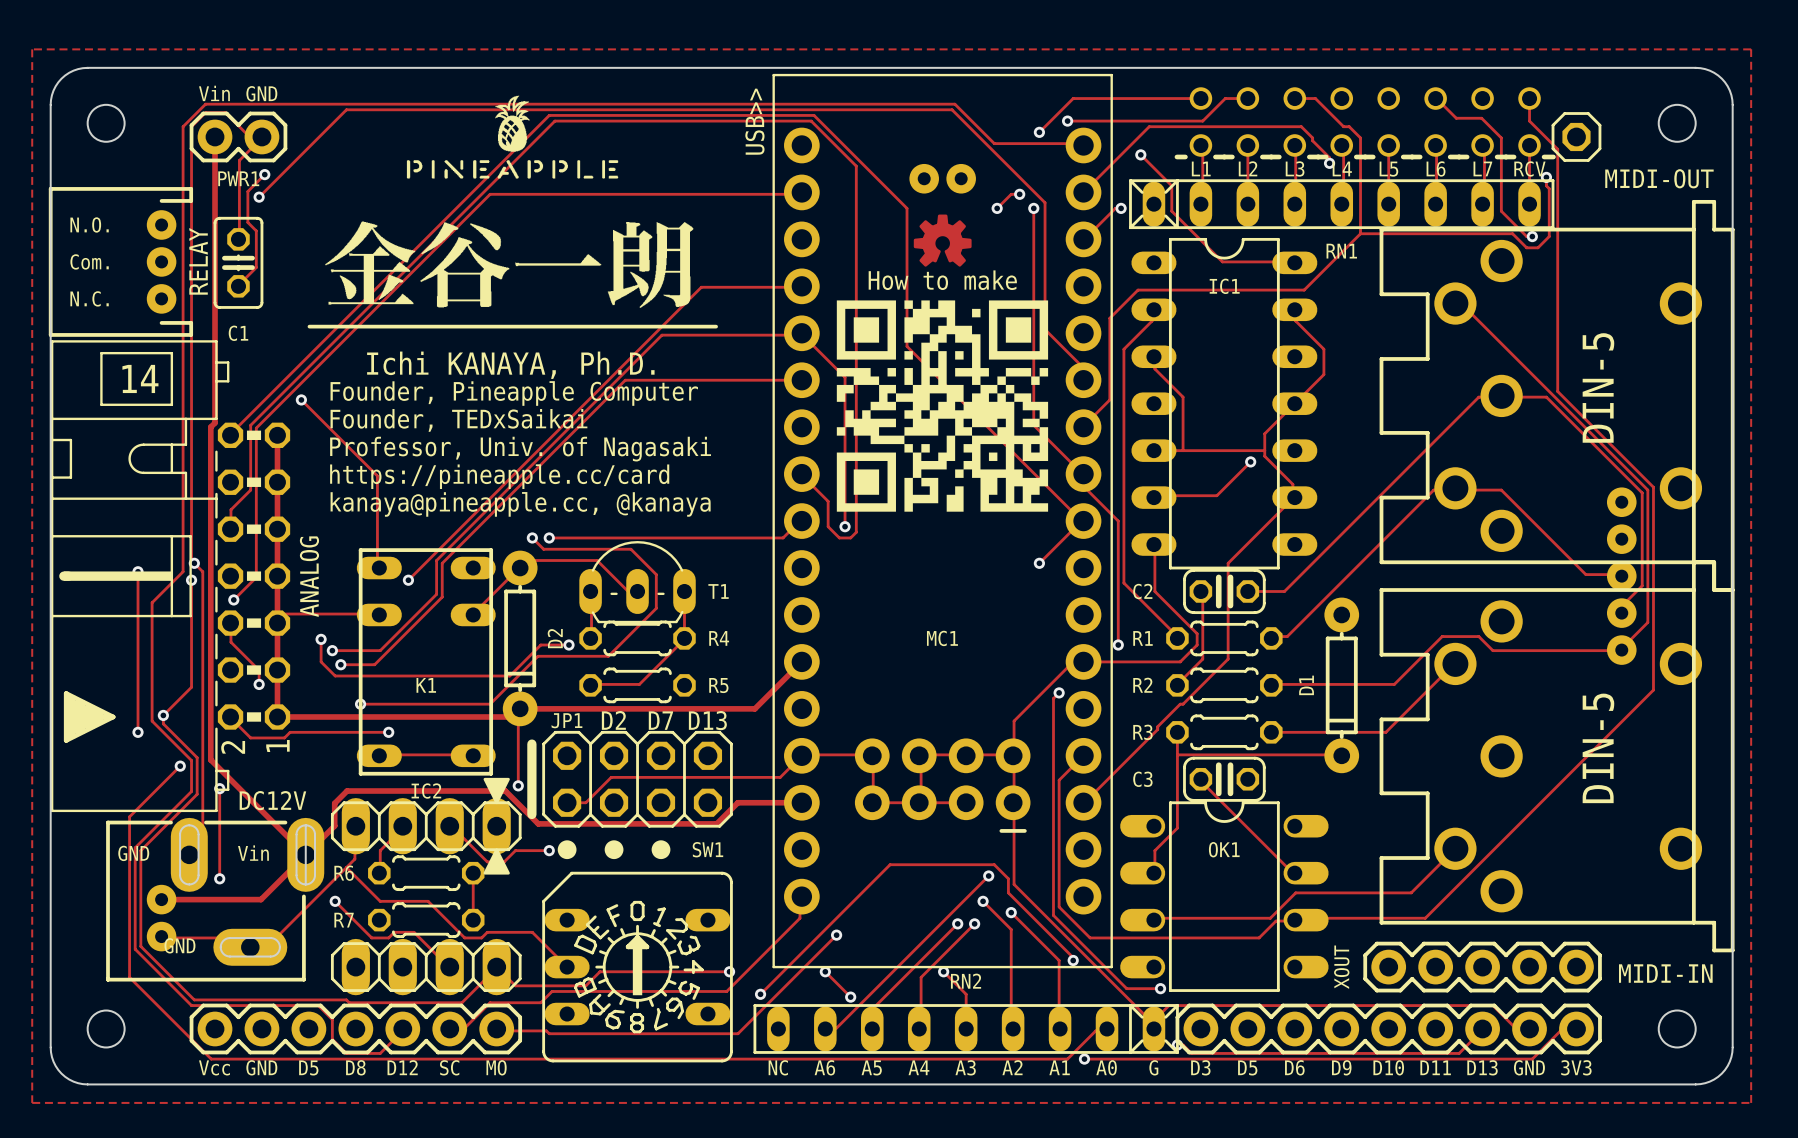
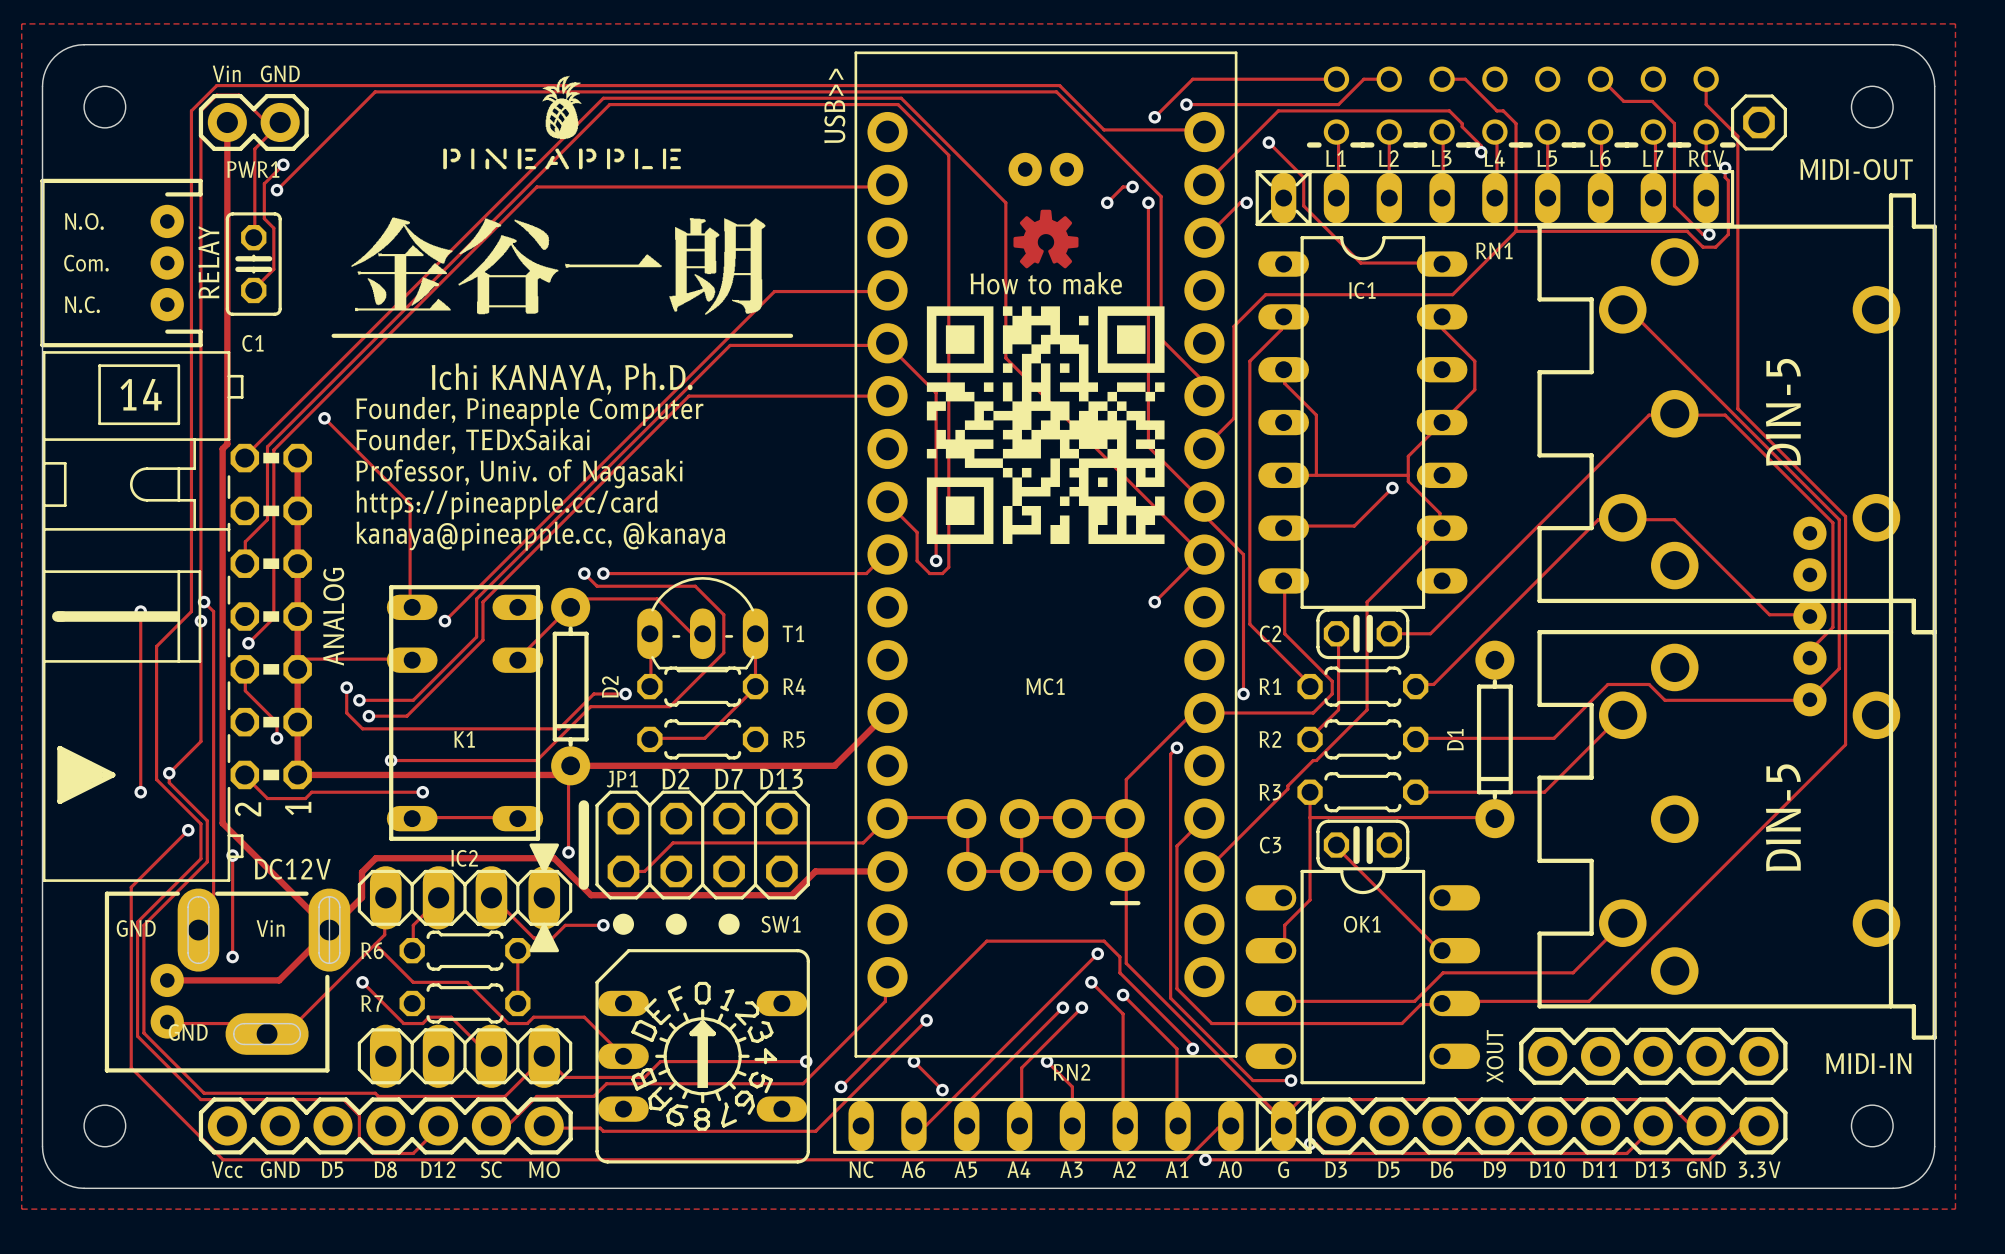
text: 3V3 (1576, 1067) -> 3.3V (1759, 1169)

